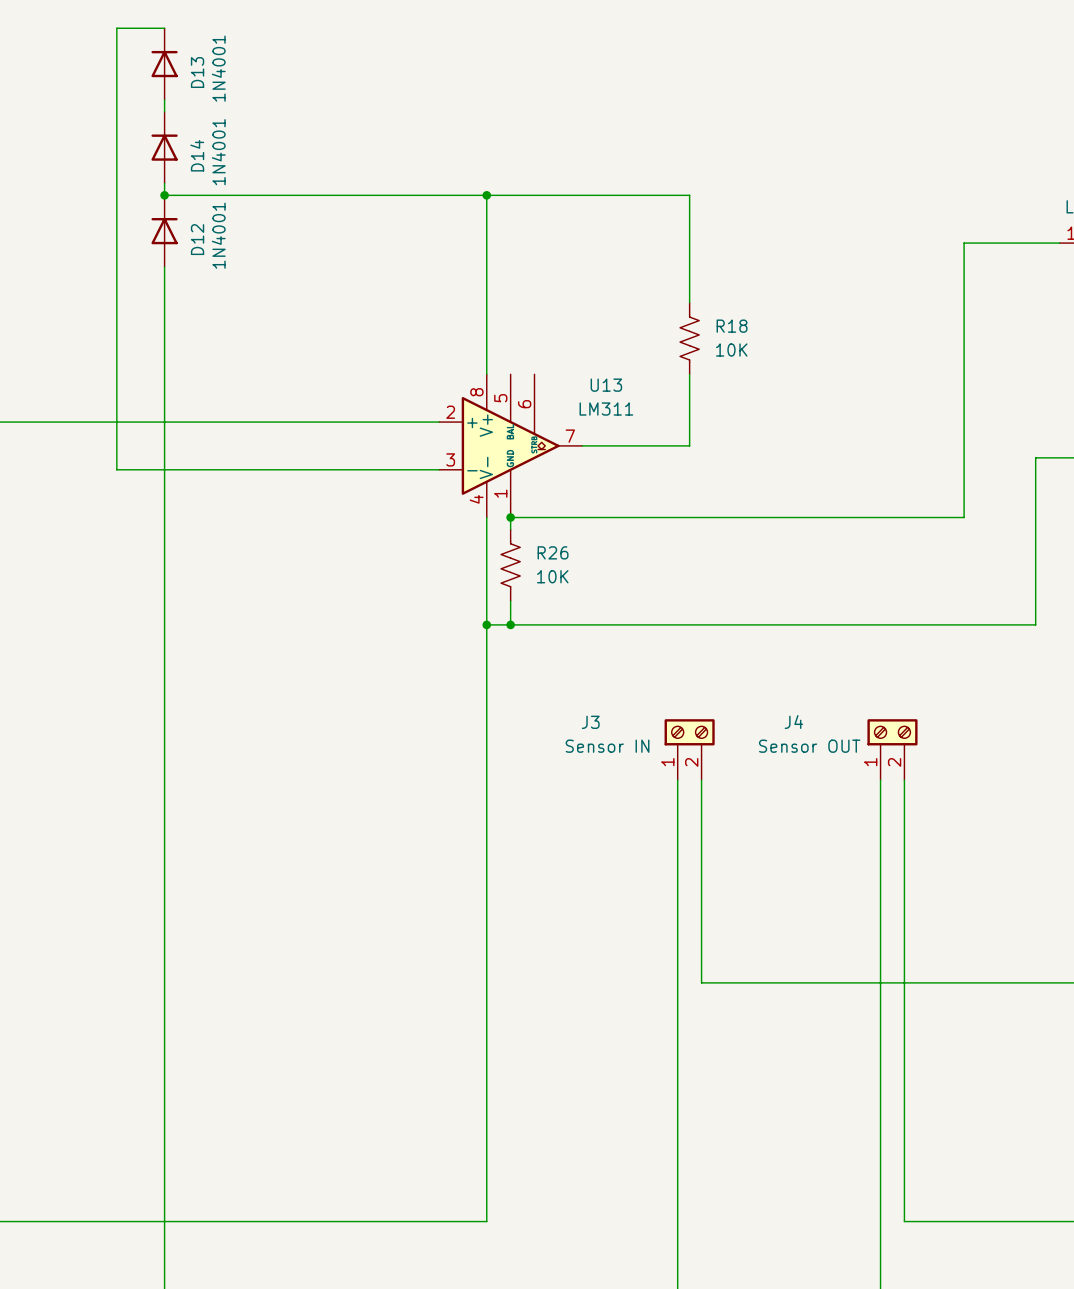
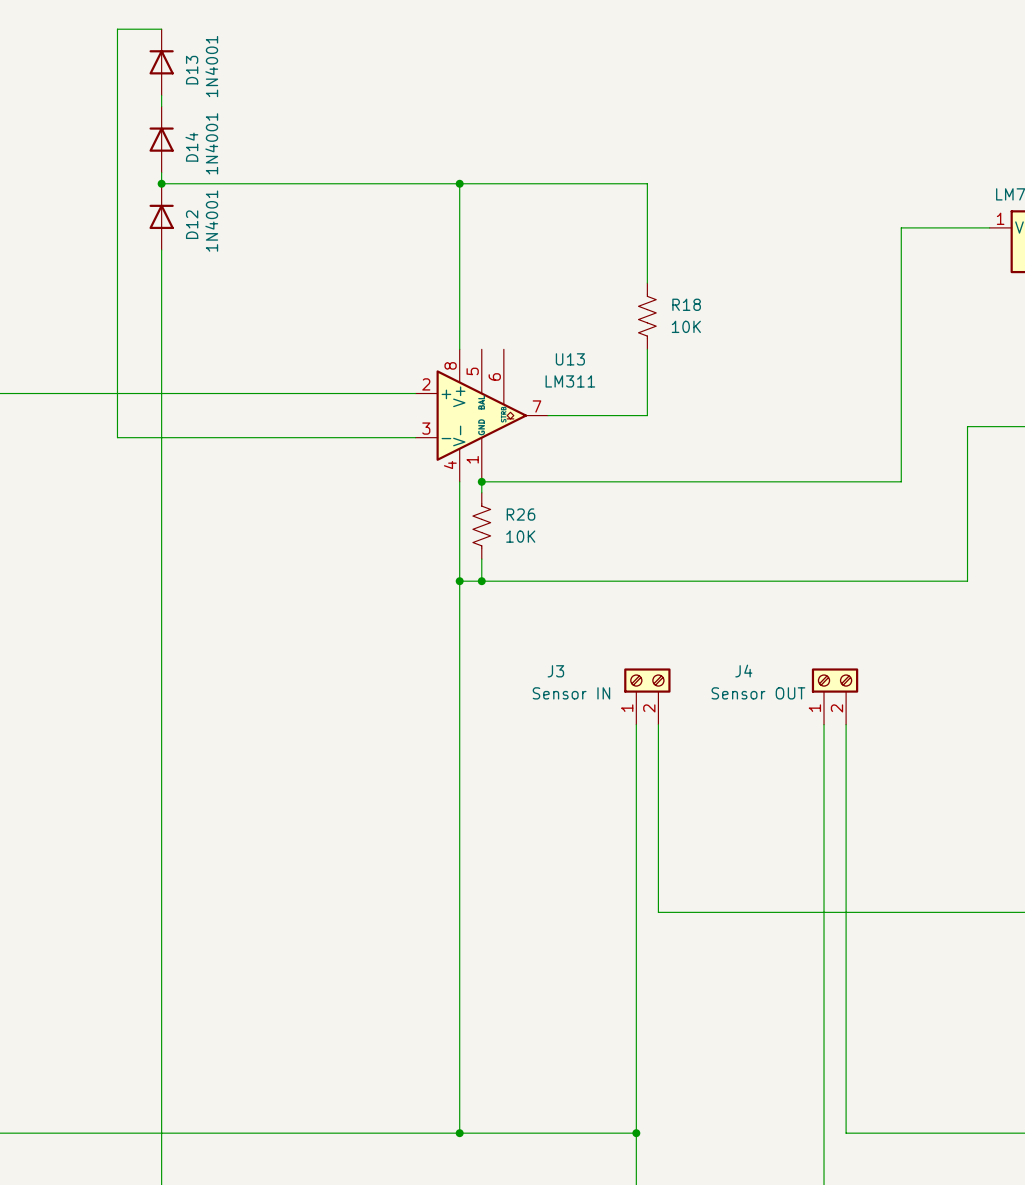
wire: none -> (459, 1133) (636, 1133)
junction: none -> (459, 1133)
junction: none -> (636, 1133)

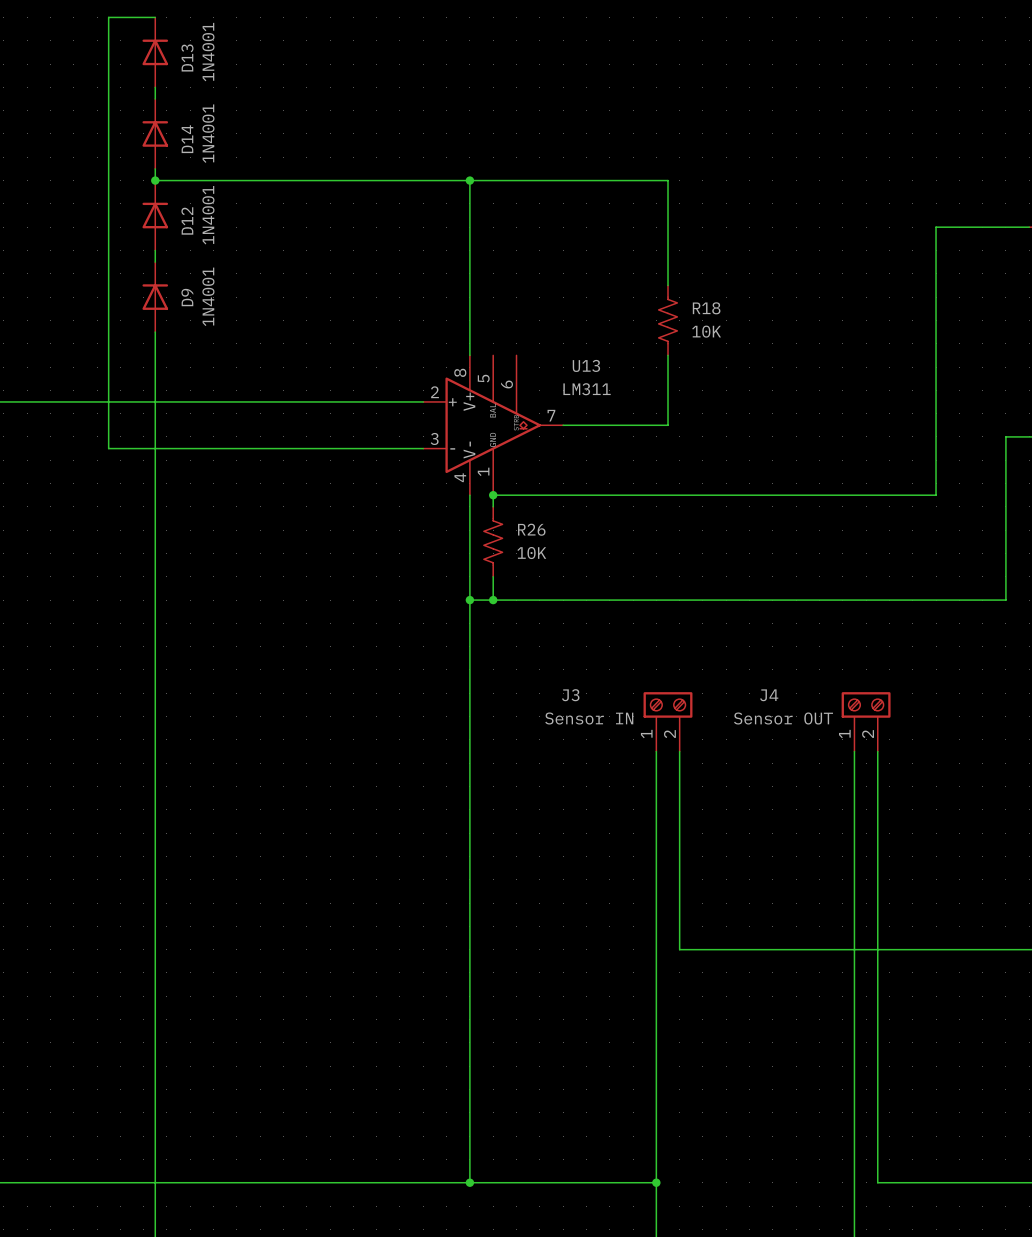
D9: none -> 1N4001 (155, 297)

